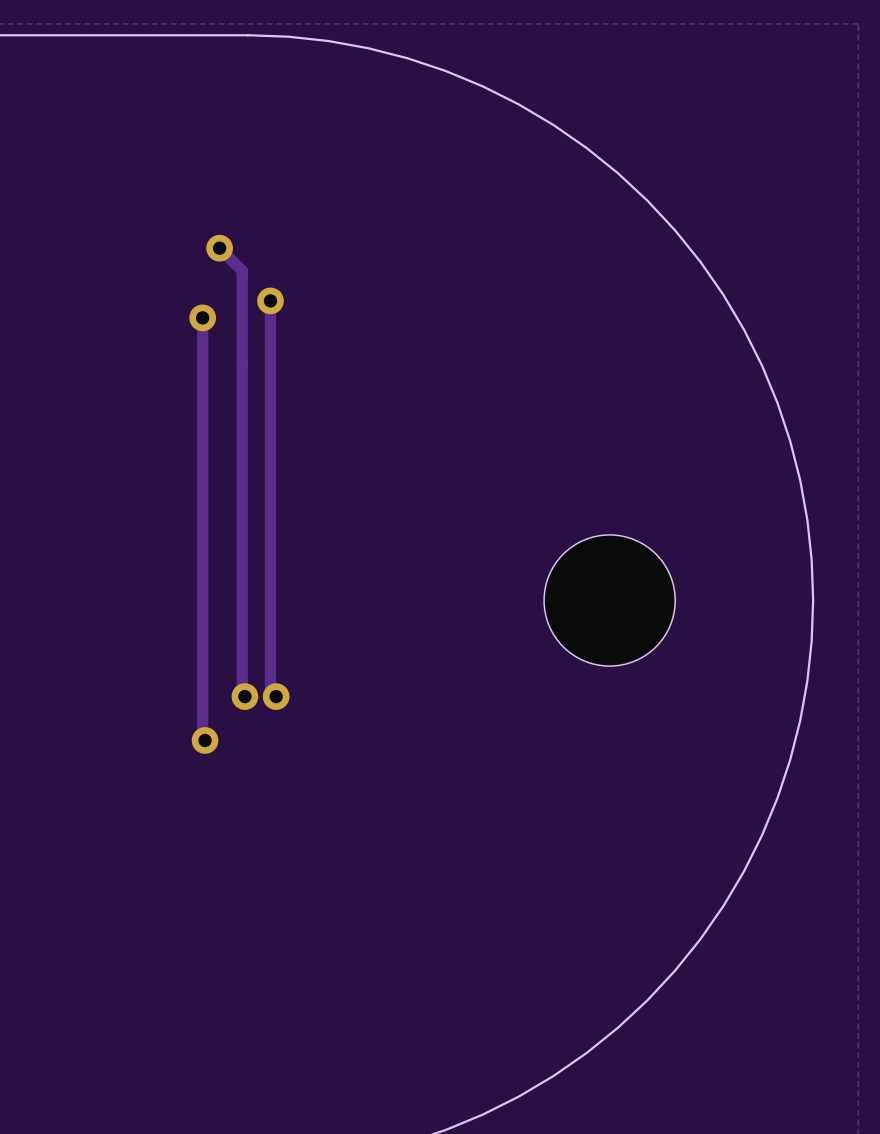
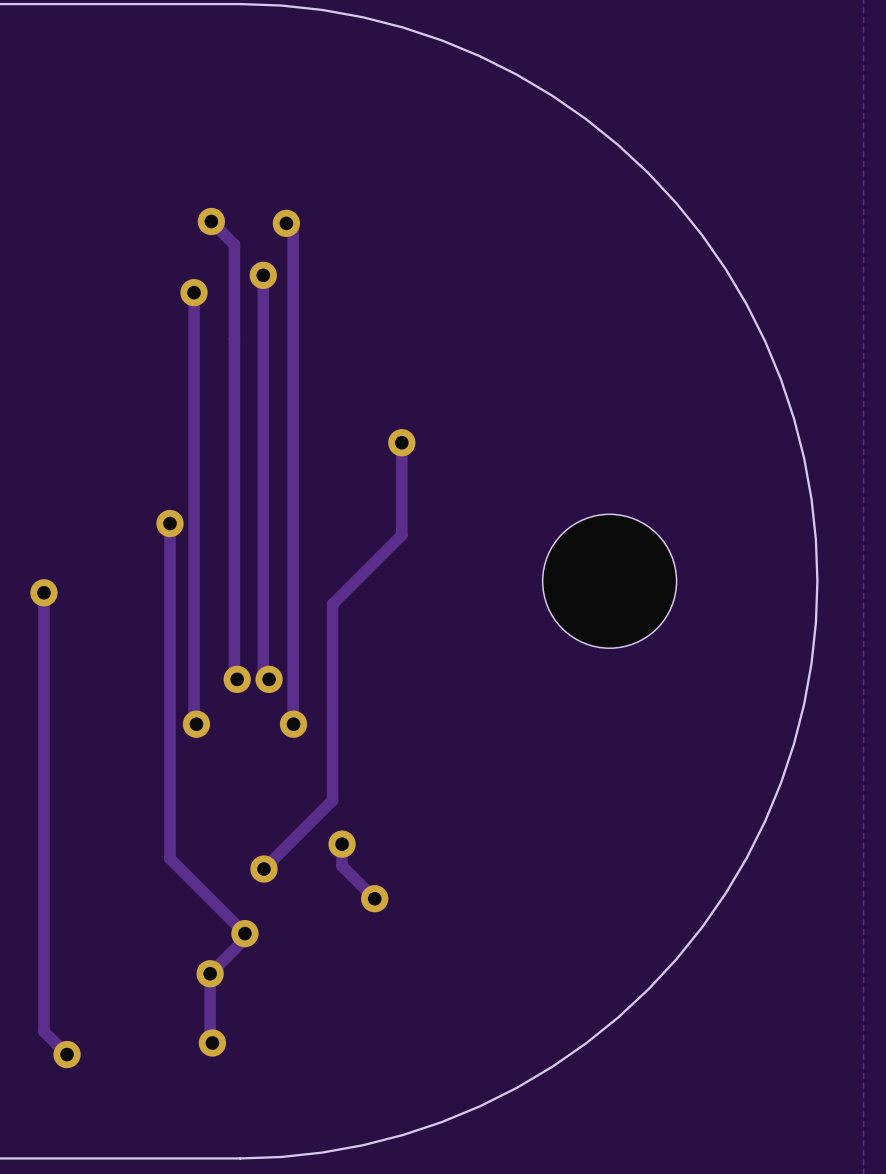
track: none -> (286, 223) (293, 230) (293, 723)
via: none -> (286, 223)
track: none -> (401, 442) (401, 535) (332, 604) (332, 800) (263, 869)
via: none -> (401, 442)
track: none -> (170, 523) (170, 858) (244, 933) (244, 938) (210, 973) (210, 1040) (212, 1043)
via: none -> (170, 523)
track: none -> (43, 592) (43, 1031) (67, 1054)
via: none -> (43, 592)
via: none -> (293, 724)
track: none -> (342, 844) (342, 866) (374, 898)
via: none -> (342, 844)
via: none -> (263, 869)
via: none -> (374, 898)
via: none -> (244, 933)
via: none -> (210, 973)
via: none -> (212, 1043)
via: none -> (67, 1054)

